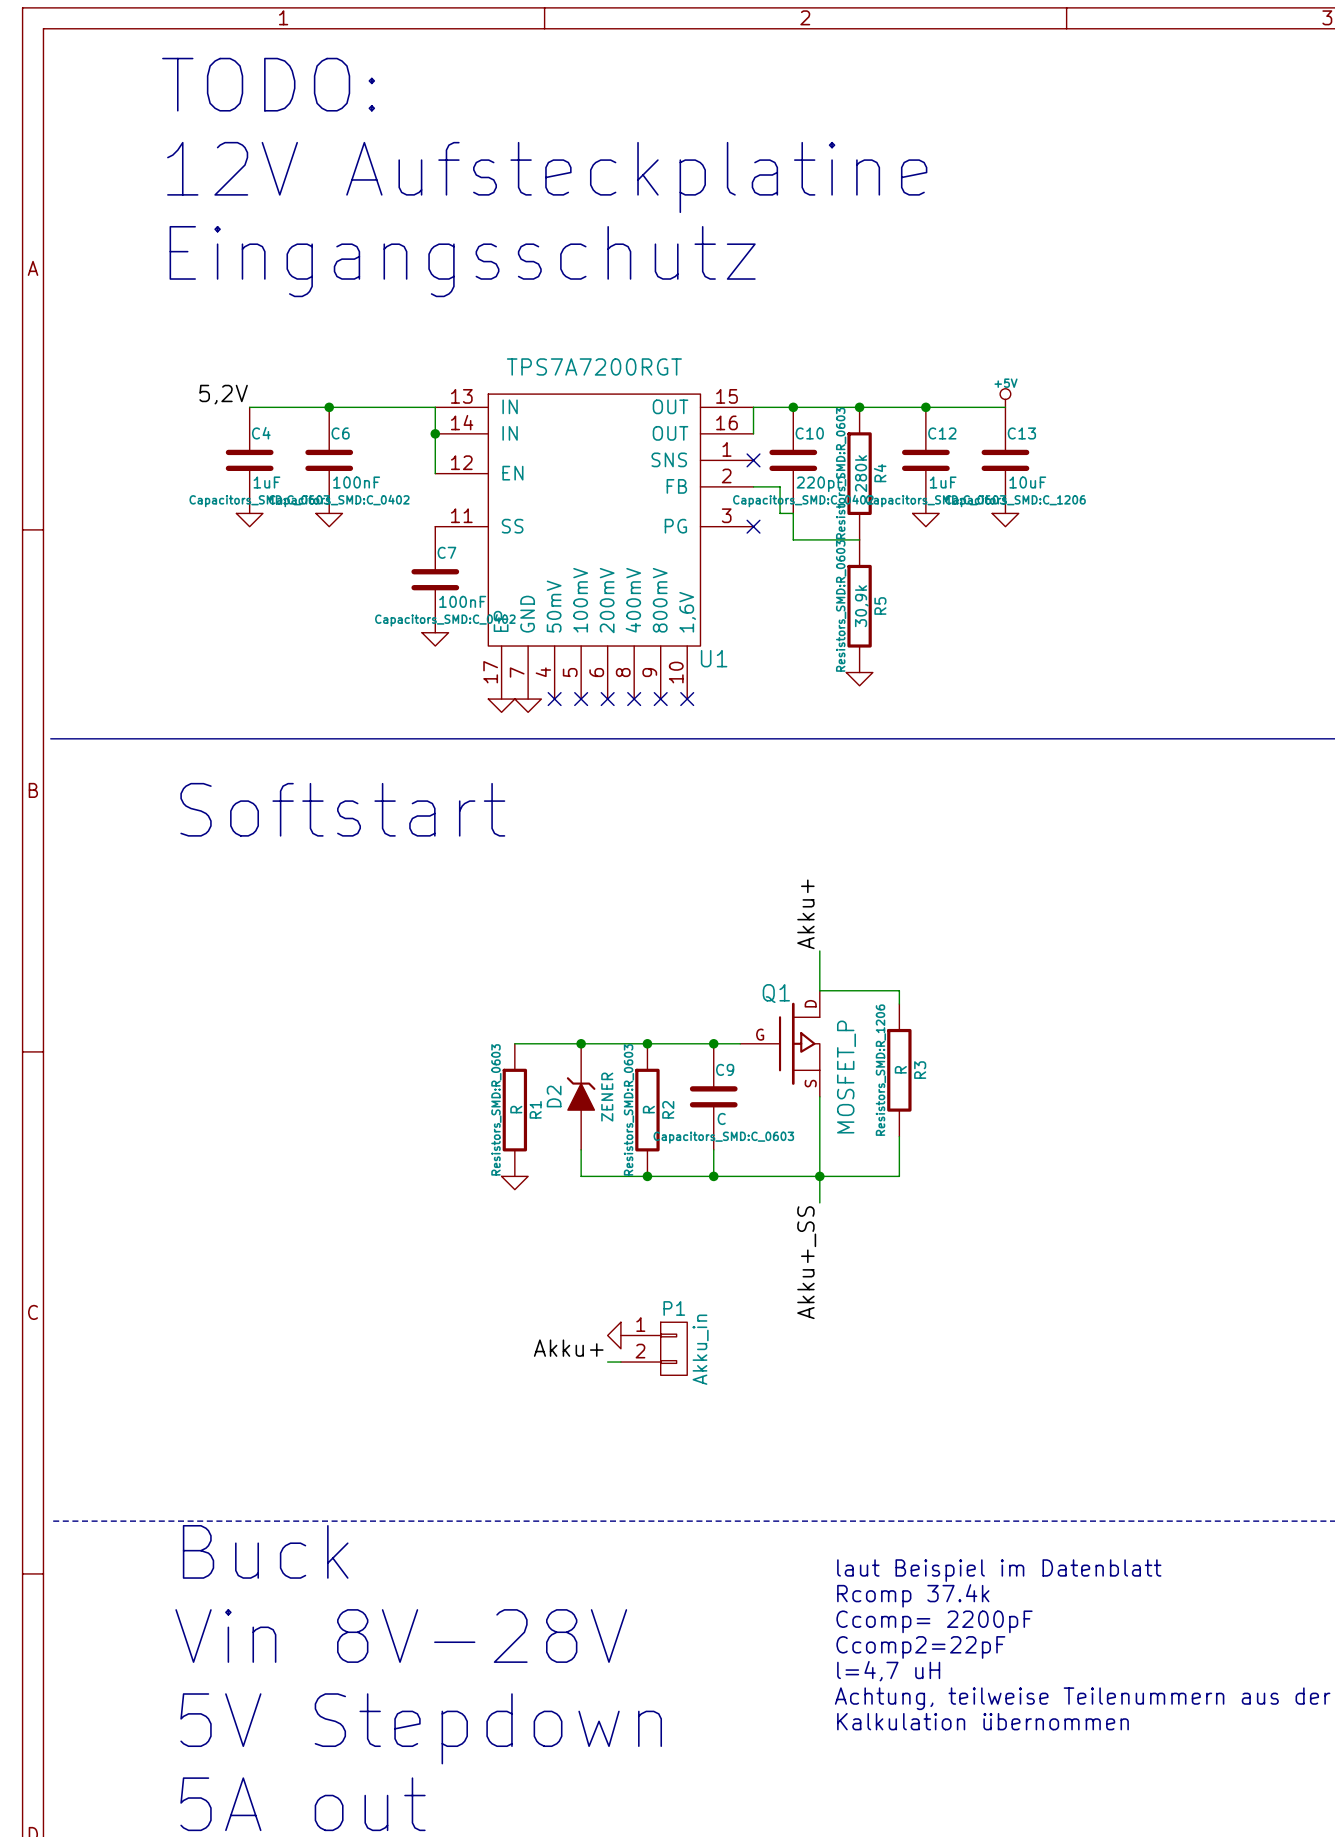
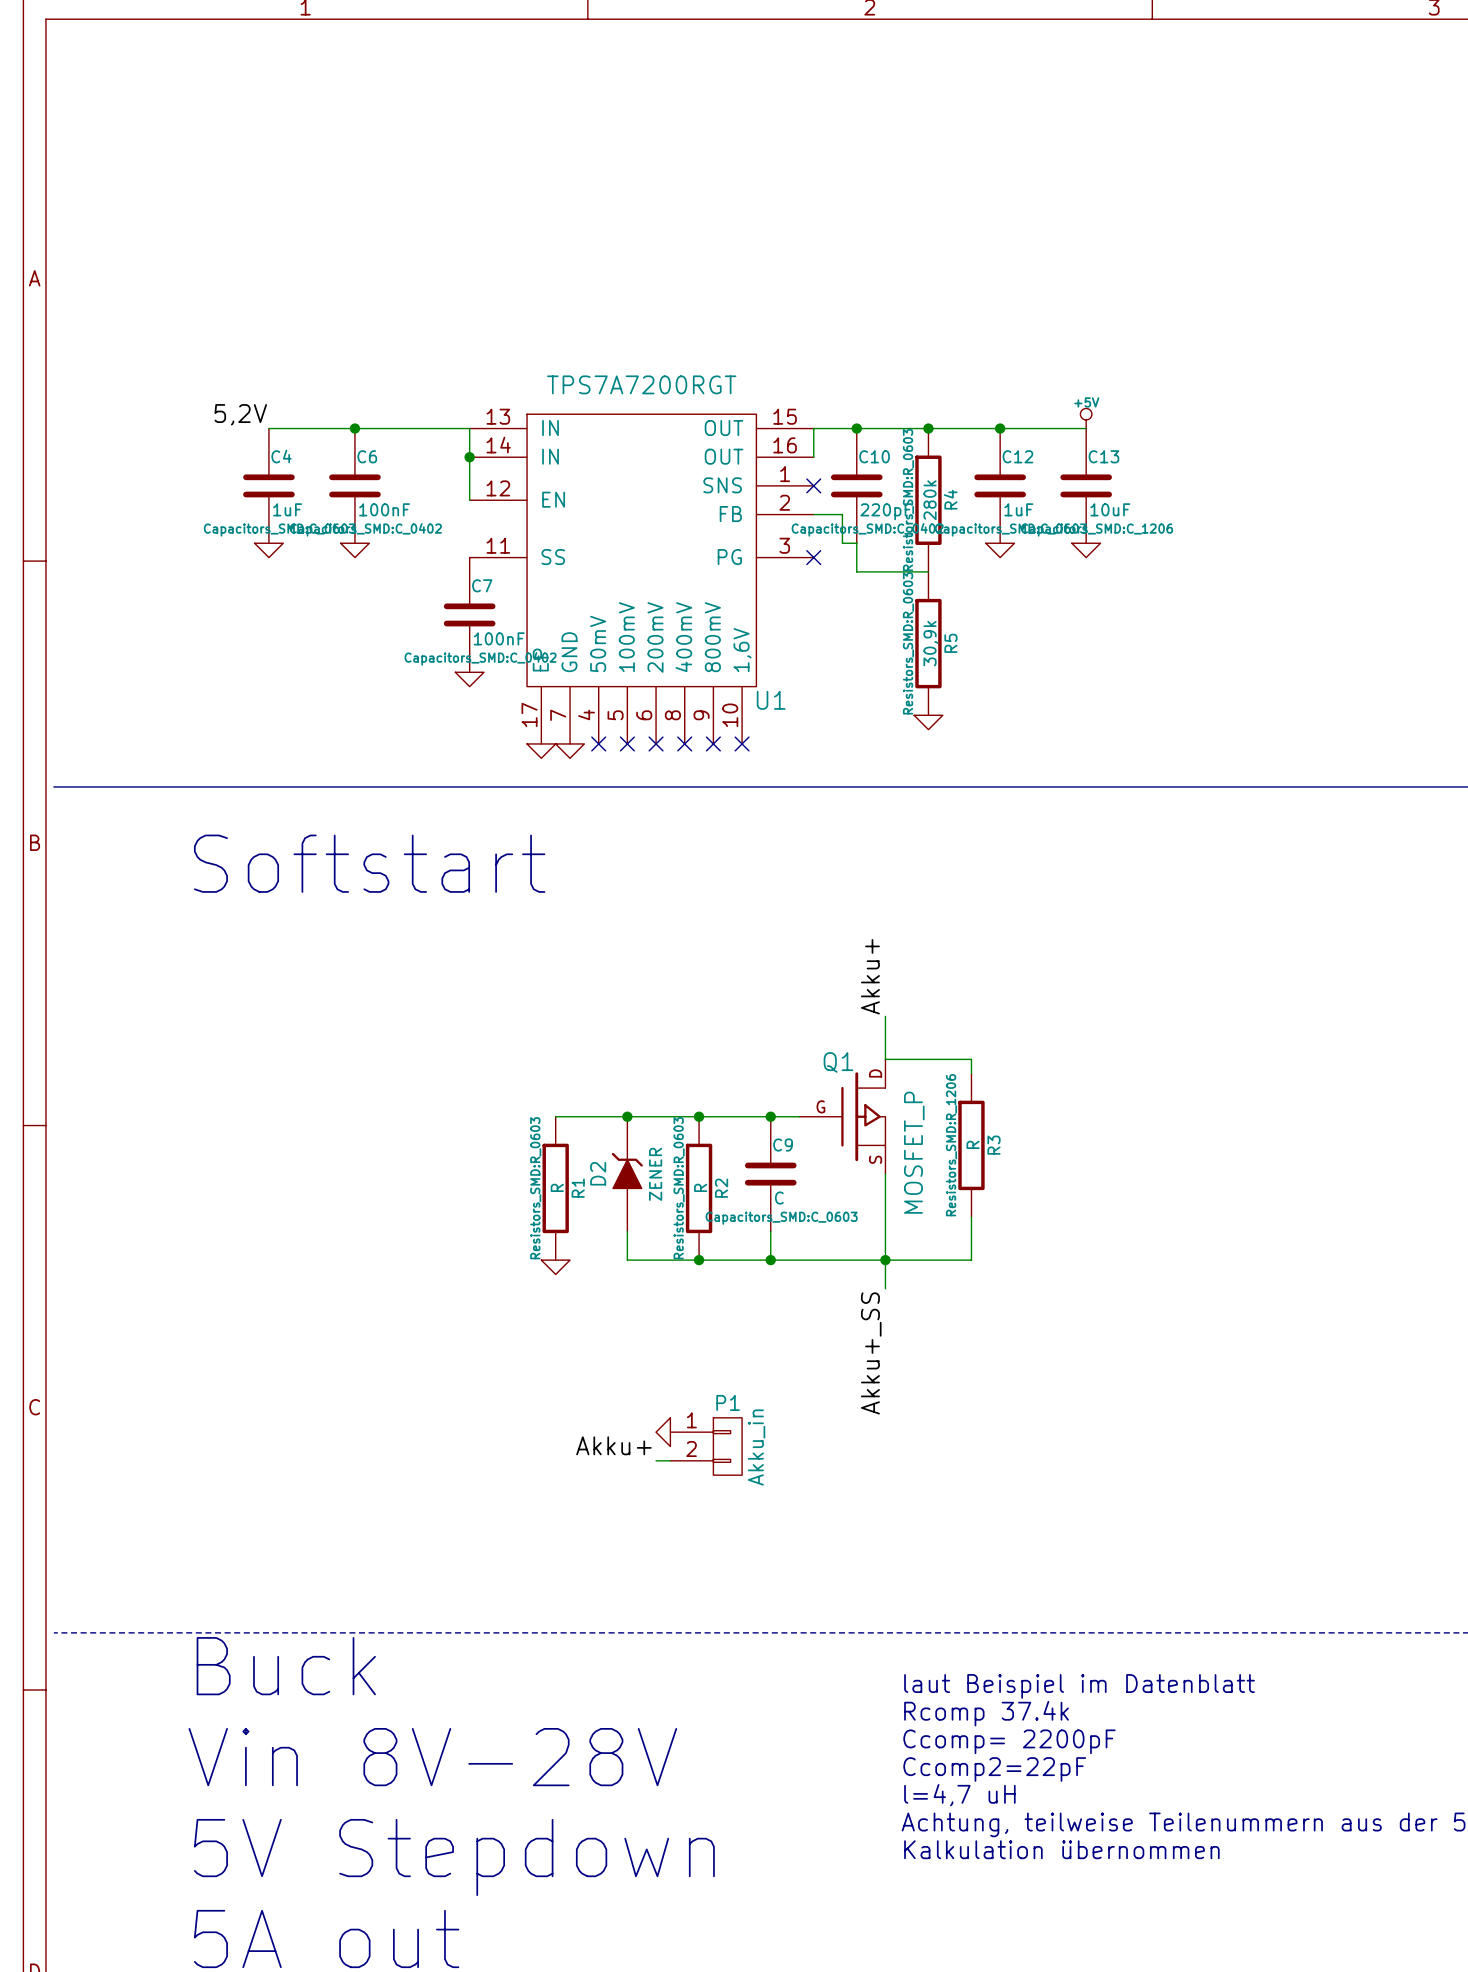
text: TODO: (268, 84) -> none
text: 12V Aufsteckplatine (547, 177) -> none
text: Eingangsschutz (462, 261) -> none

